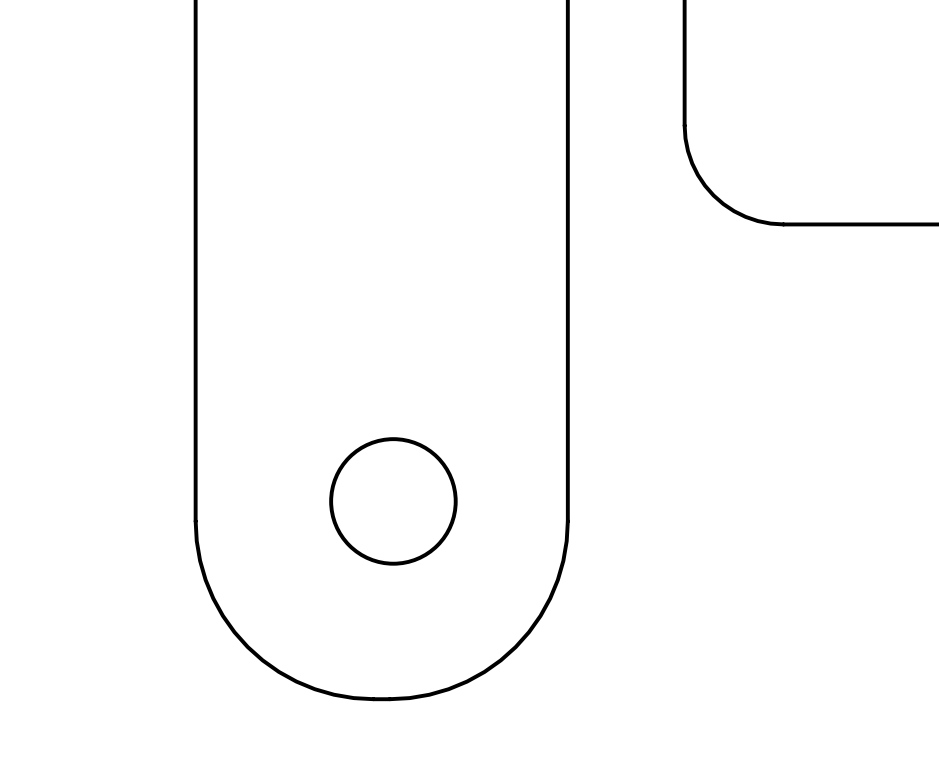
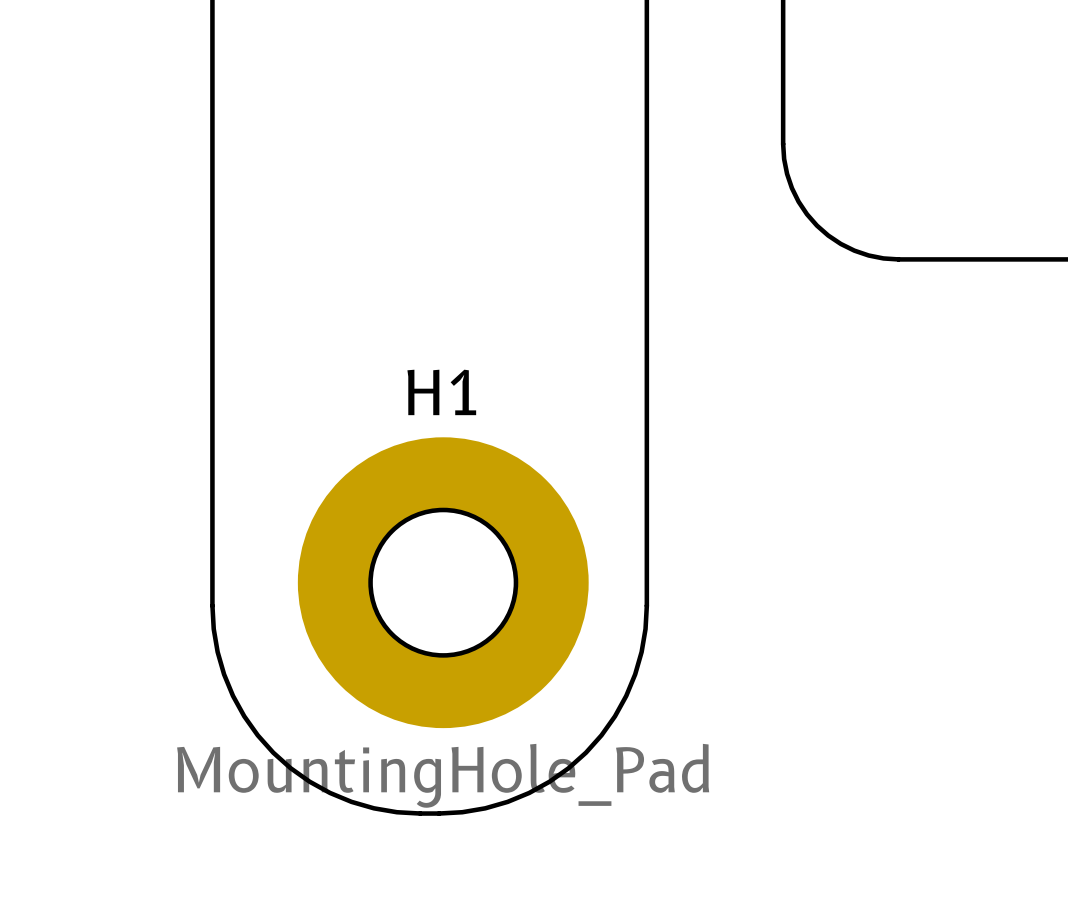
H1: none -> MountingHole_Pad (443, 582)

